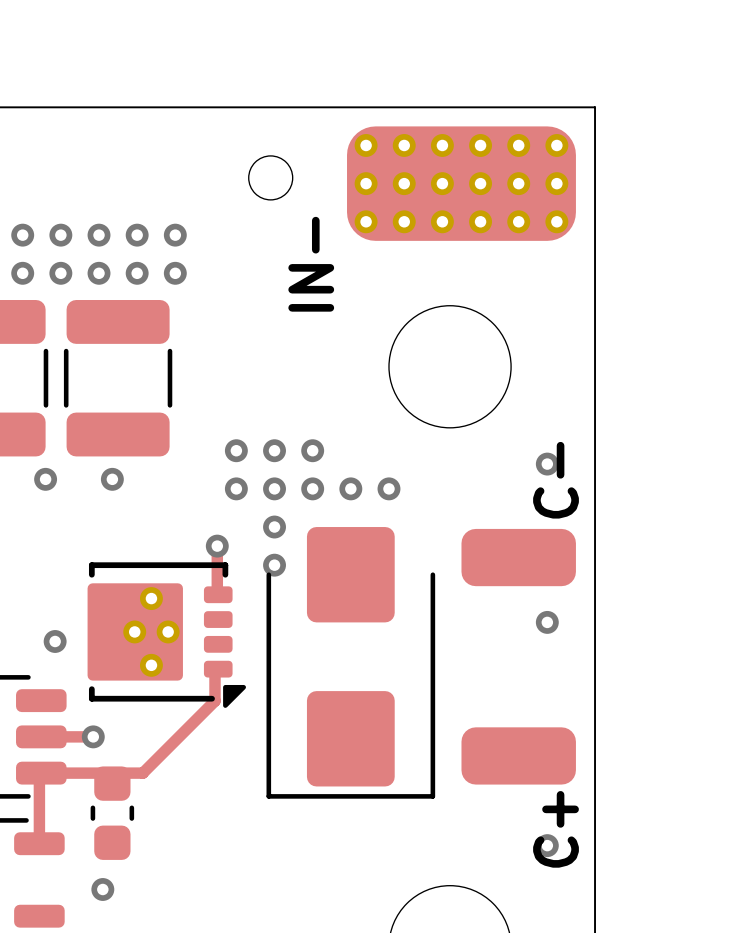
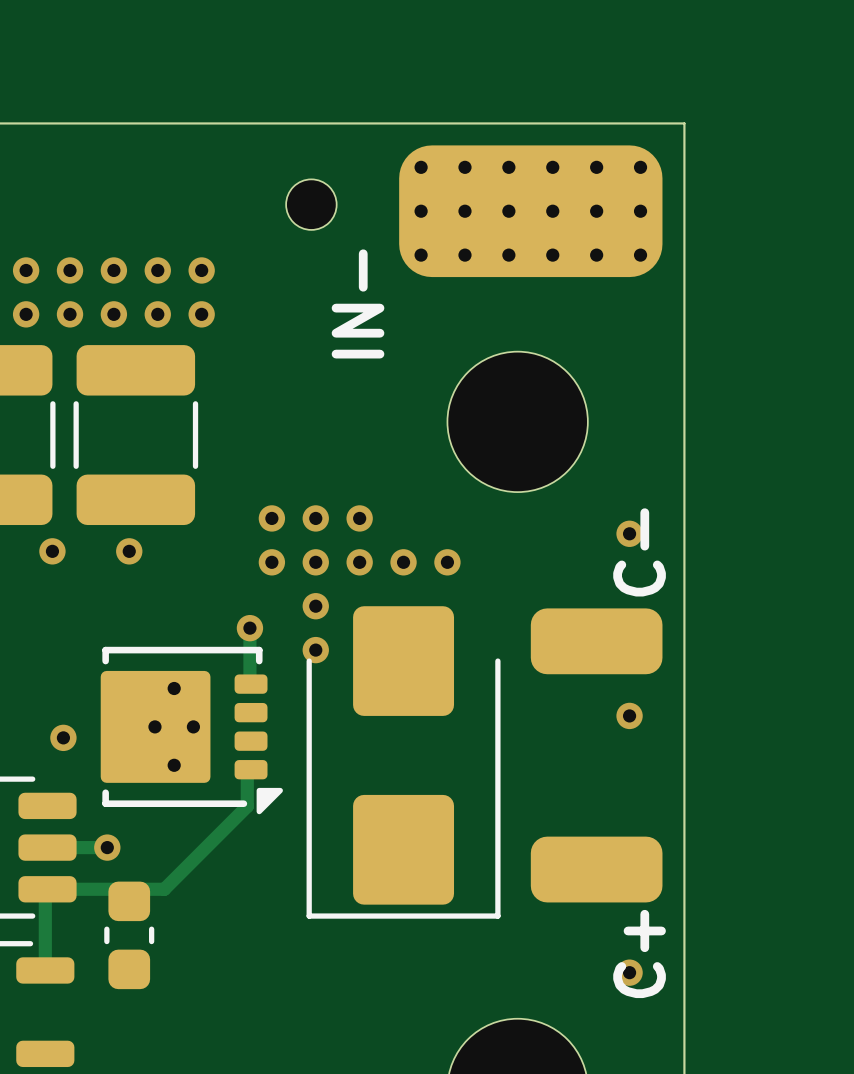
via: (102, 889) -> none

